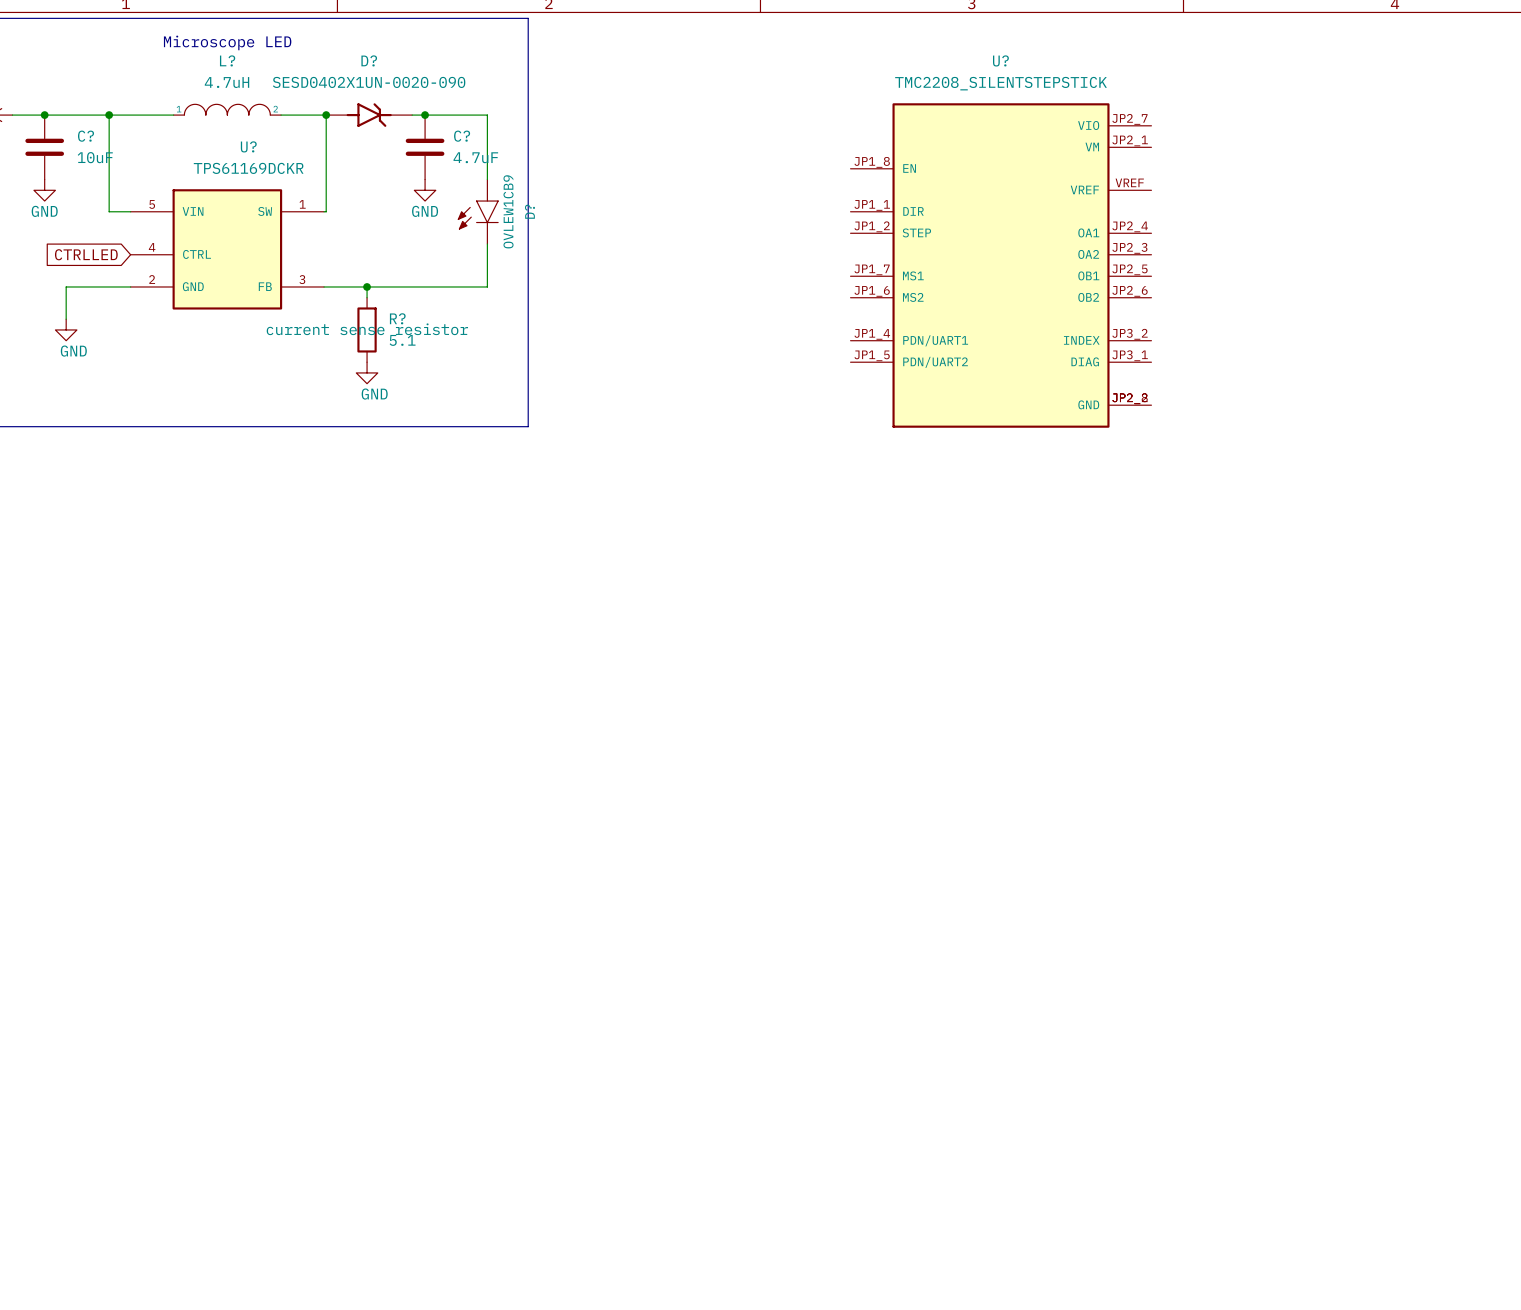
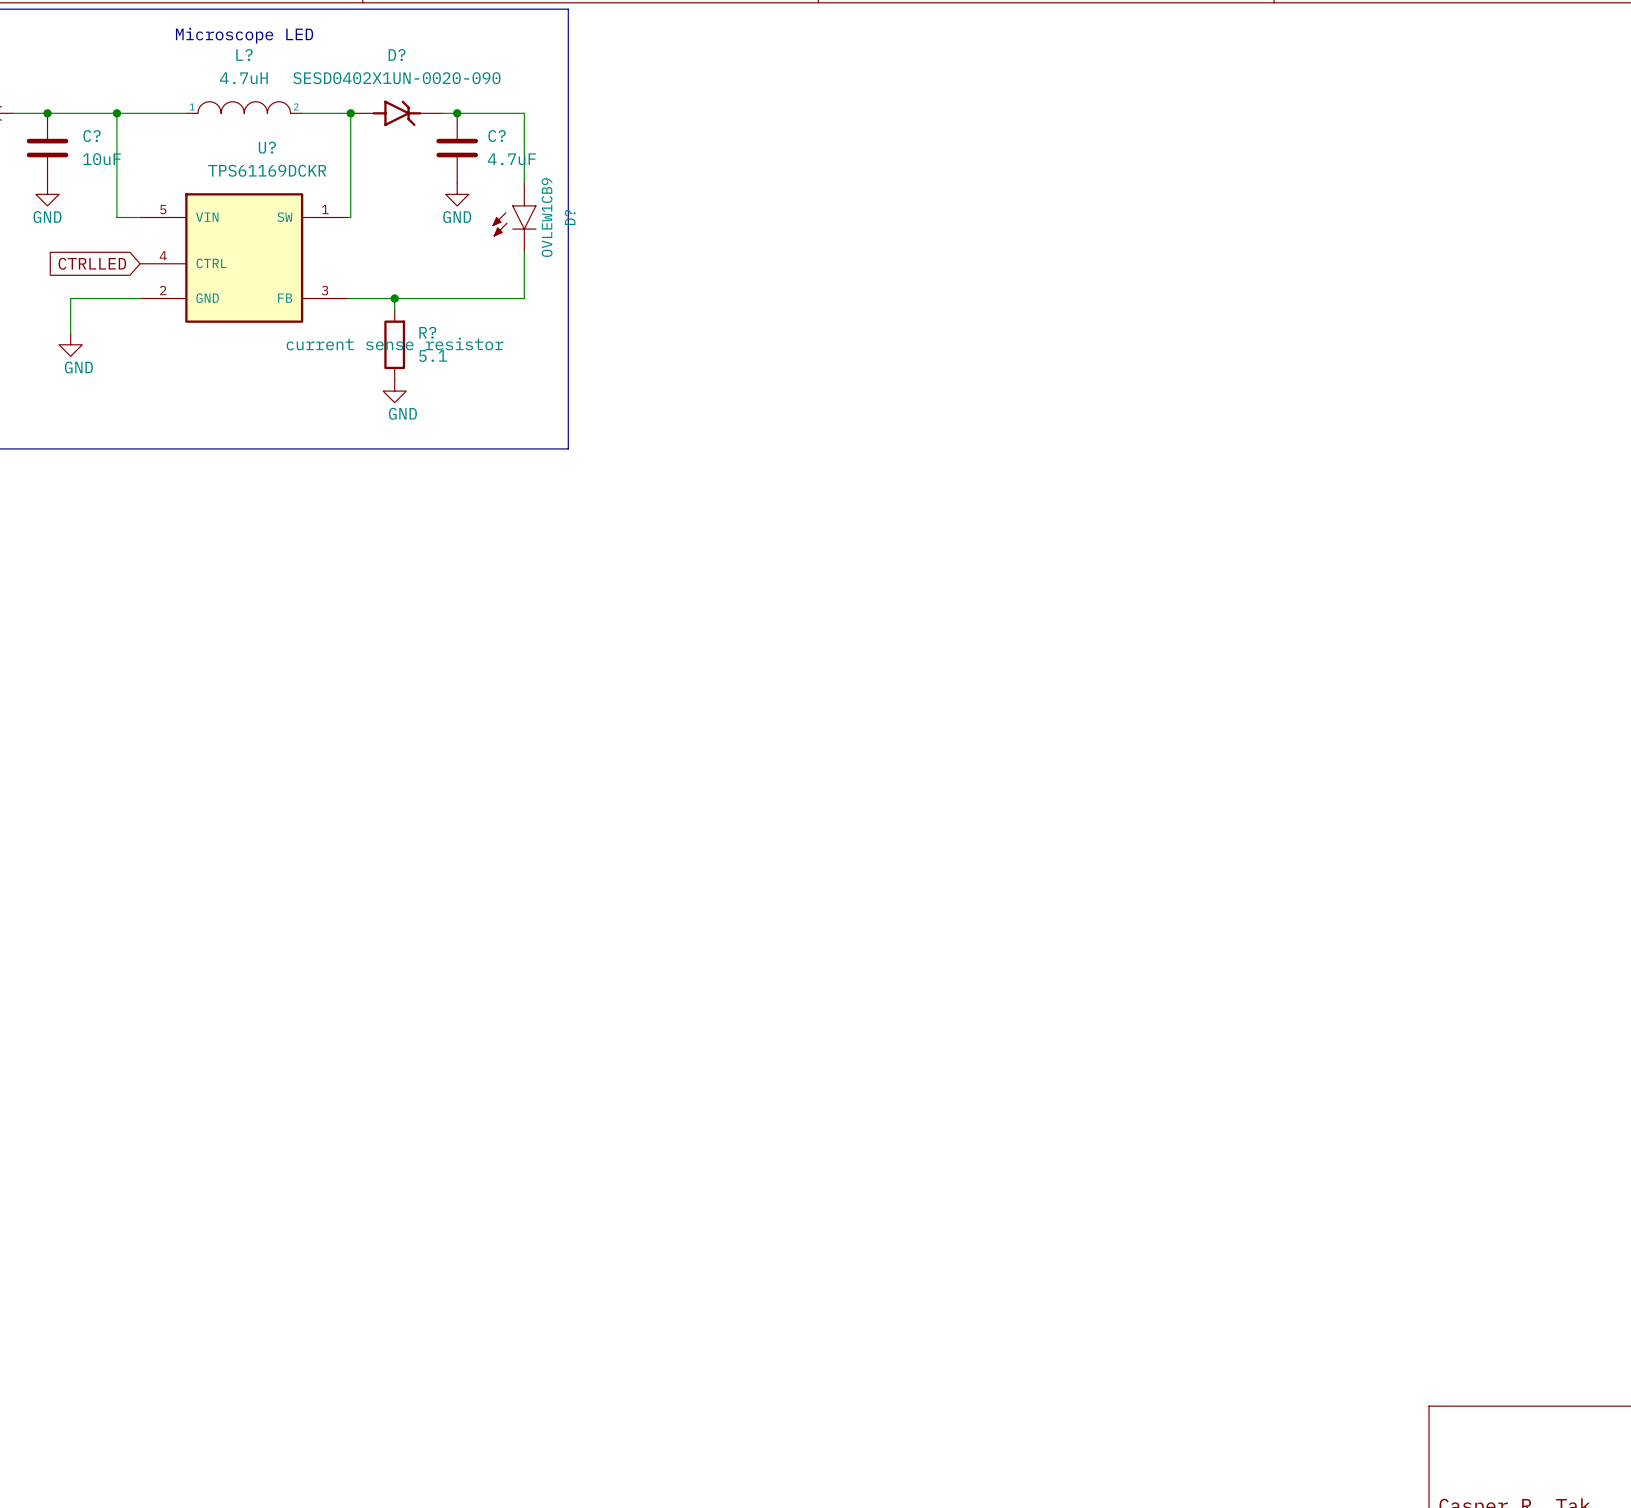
U?: TMC2208_SILENTSTEPSTICK (1001, 265) -> none

